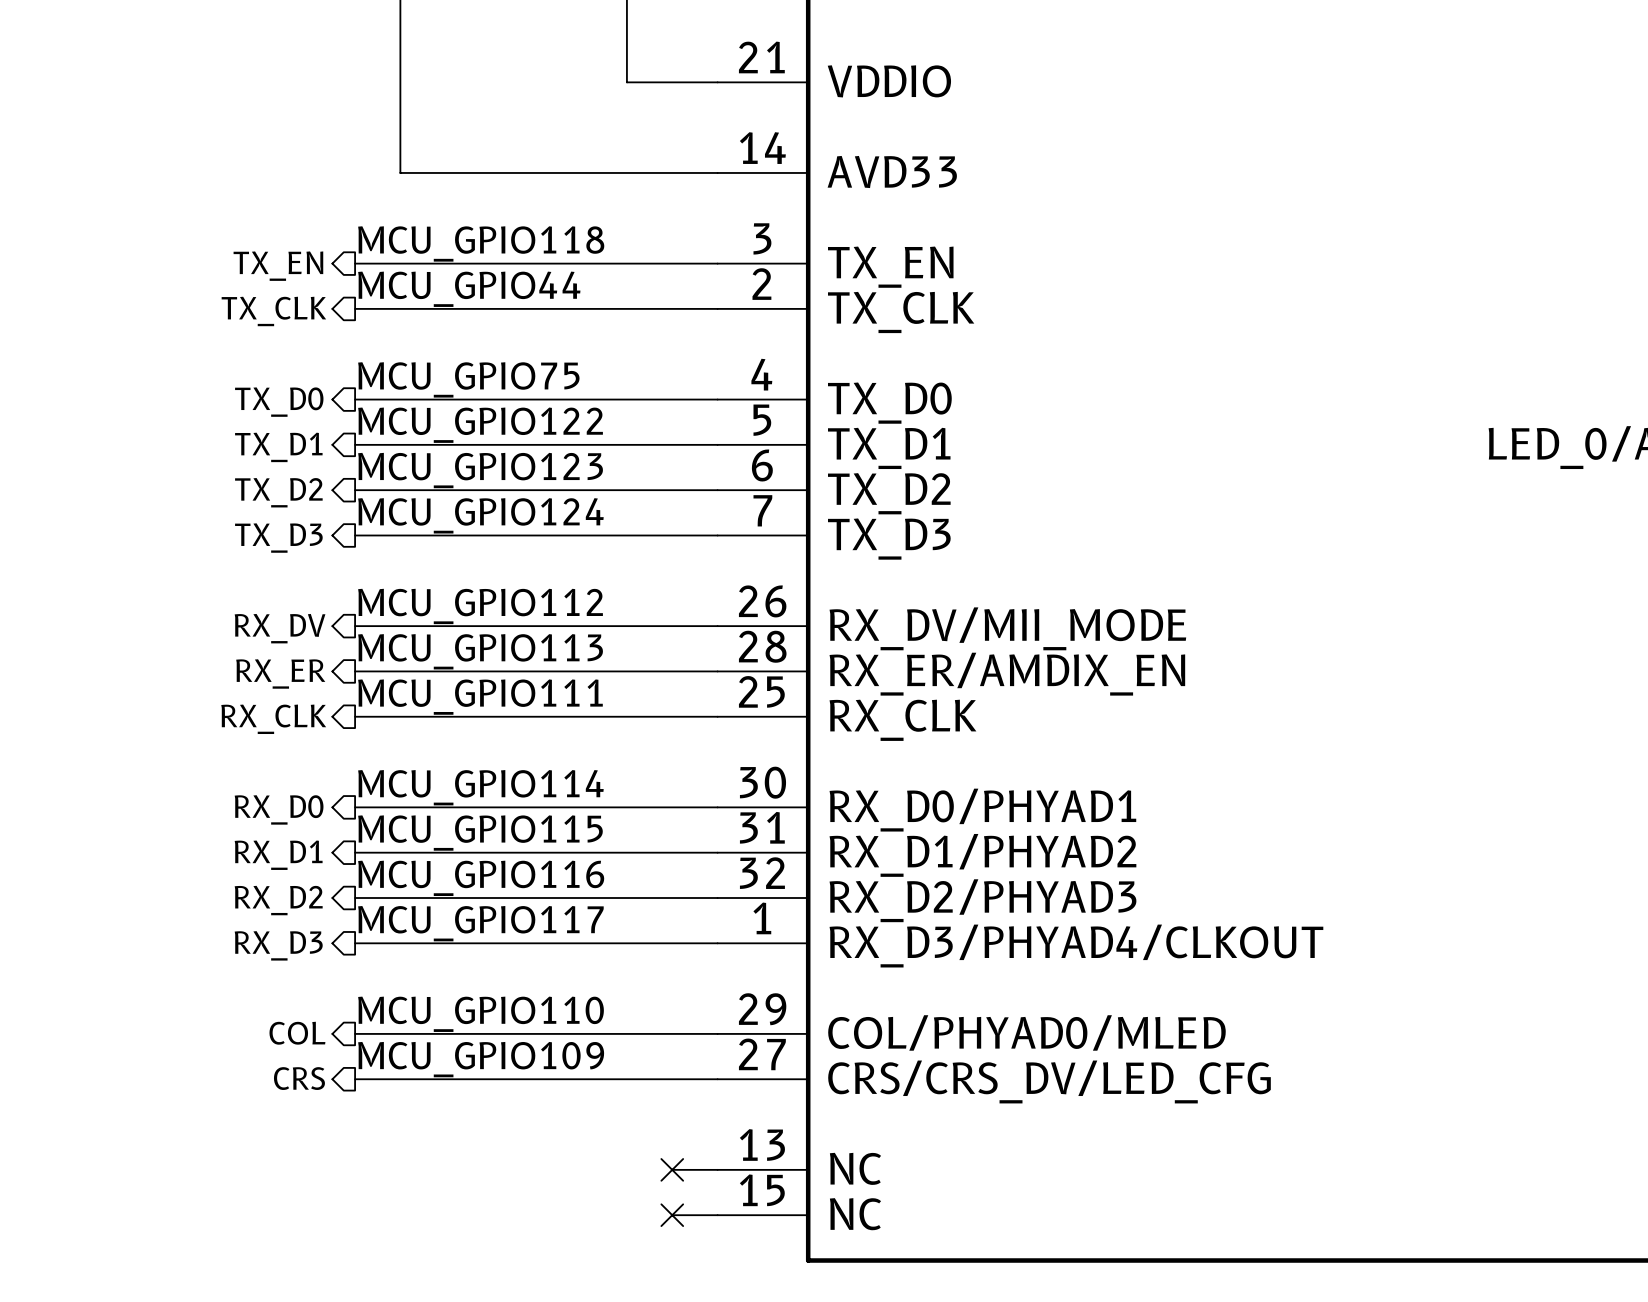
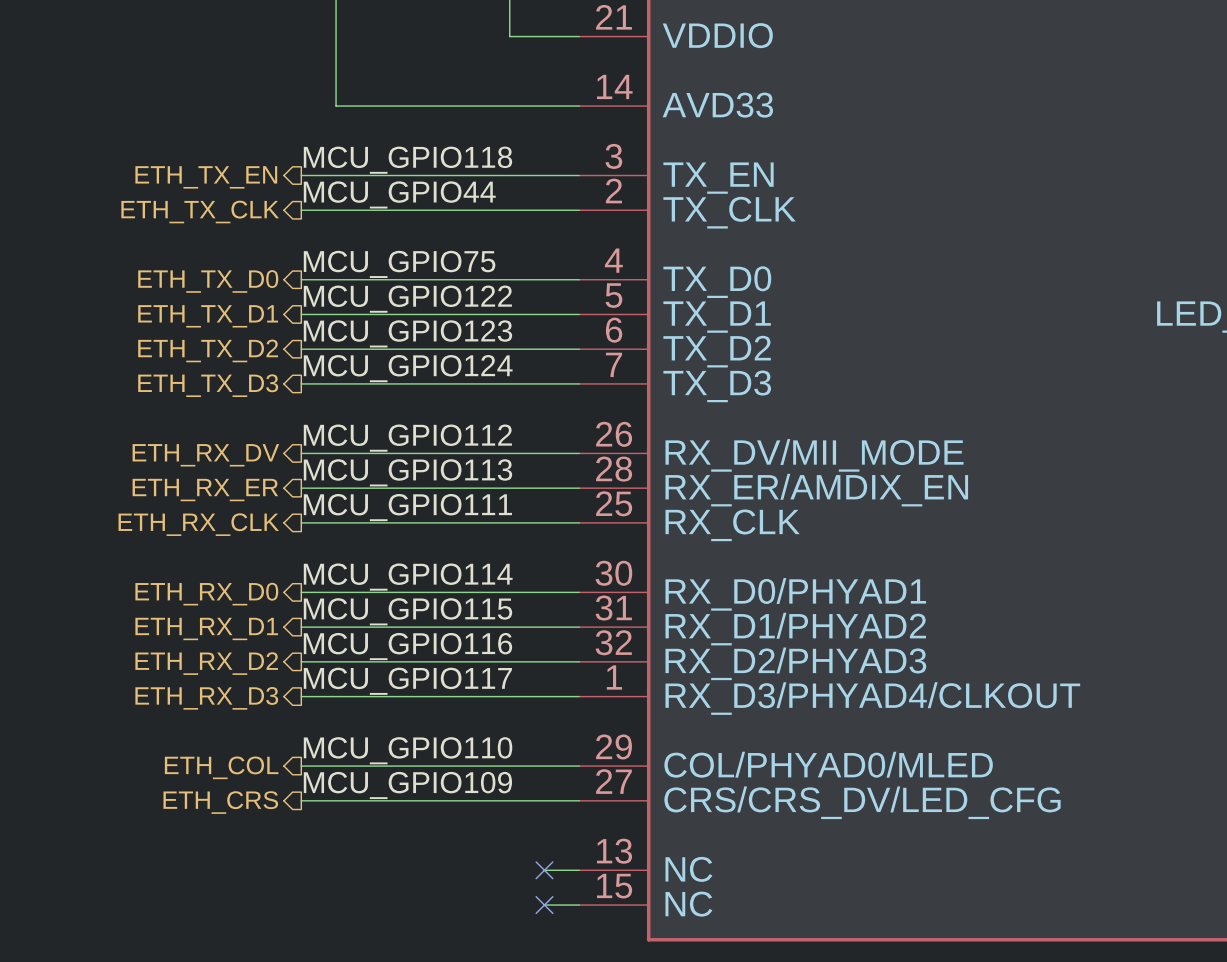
hierarchical label: TX_EN (278, 266) -> ETH_TX_EN (206, 177)
hierarchical label: TX_CLK (273, 311) -> ETH_TX_CLK (200, 211)
hierarchical label: TX_D0 (279, 402) -> ETH_TX_D0 (208, 281)
hierarchical label: TX_D1 (278, 447) -> ETH_TX_D1 (208, 316)
hierarchical label: TX_D2 (278, 492) -> ETH_TX_D2 (208, 350)
hierarchical label: TX_D3 (278, 538) -> ETH_TX_D3 (208, 385)
hierarchical label: RX_DV (280, 628) -> ETH_RX_DV (205, 455)
hierarchical label: RX_ER (280, 673) -> ETH_RX_ER (205, 490)
hierarchical label: RX_CLK (273, 719) -> ETH_RX_CLK (198, 524)
hierarchical label: RX_D0 (279, 809) -> ETH_RX_D0 (206, 594)
hierarchical label: RX_D1 (278, 855) -> ETH_RX_D1 (206, 628)
hierarchical label: RX_D2 (278, 900) -> ETH_RX_D2 (206, 663)
hierarchical label: RX_D3 (278, 945) -> ETH_RX_D3 (206, 698)
hierarchical label: COL (297, 1033) -> ETH_COL (221, 767)
hierarchical label: CRS (299, 1078) -> ETH_CRS (220, 802)

